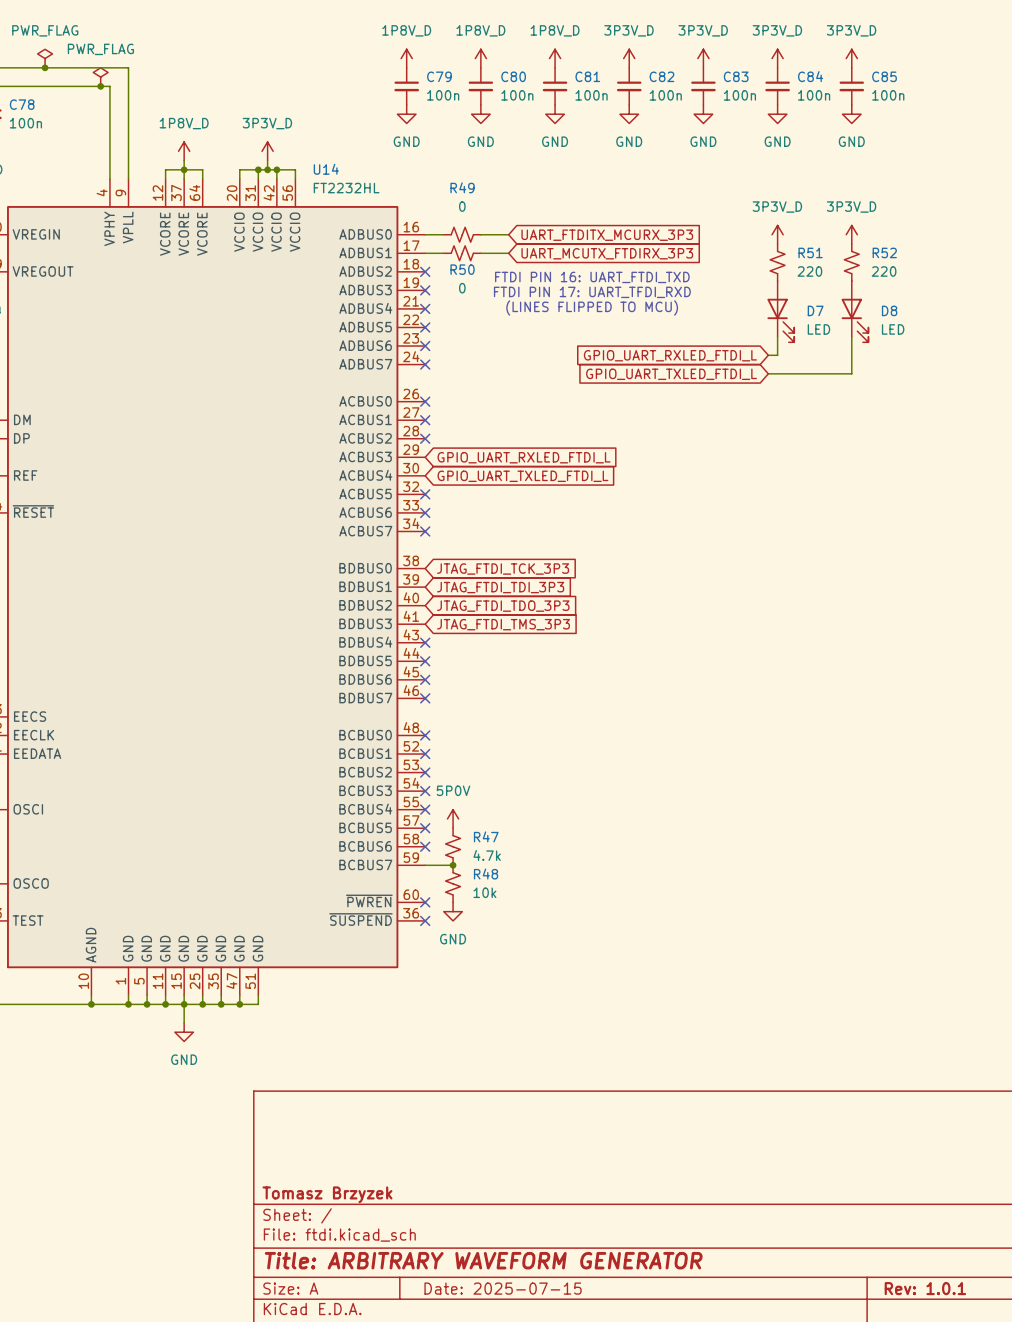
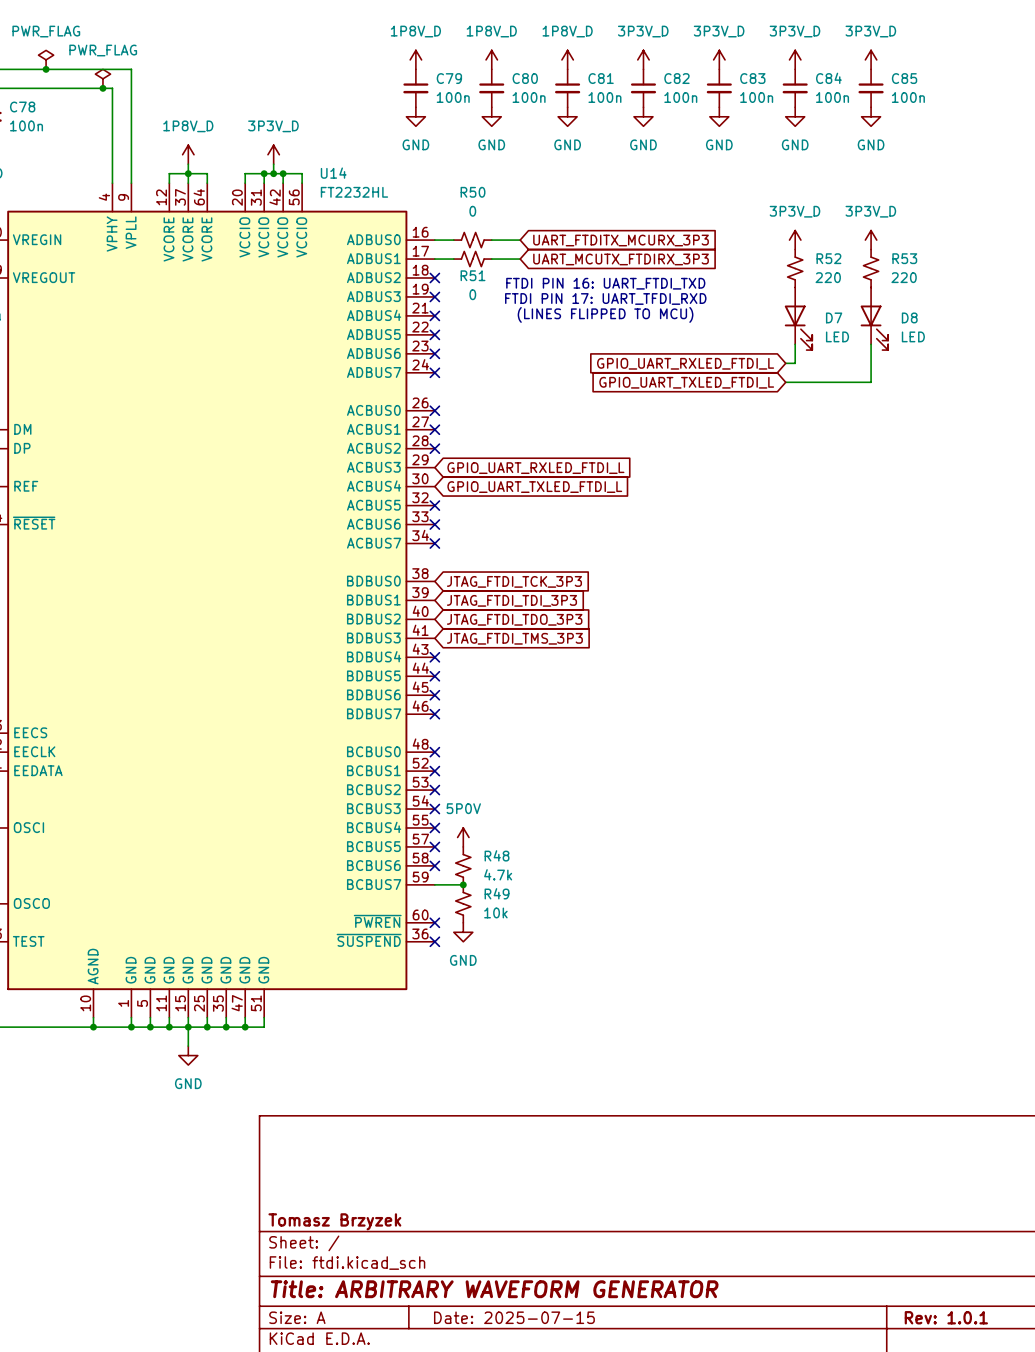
R49 name: R49 (462, 187) -> R50 (473, 192)
R51 name: R51 (810, 252) -> R52 (828, 258)
R52 name: R52 (884, 252) -> R53 (904, 258)
R50 name: R50 (462, 269) -> R51 (473, 275)
R47 name: R47 (486, 836) -> R48 (497, 855)
R48 name: R48 (486, 874) -> R49 (497, 893)

